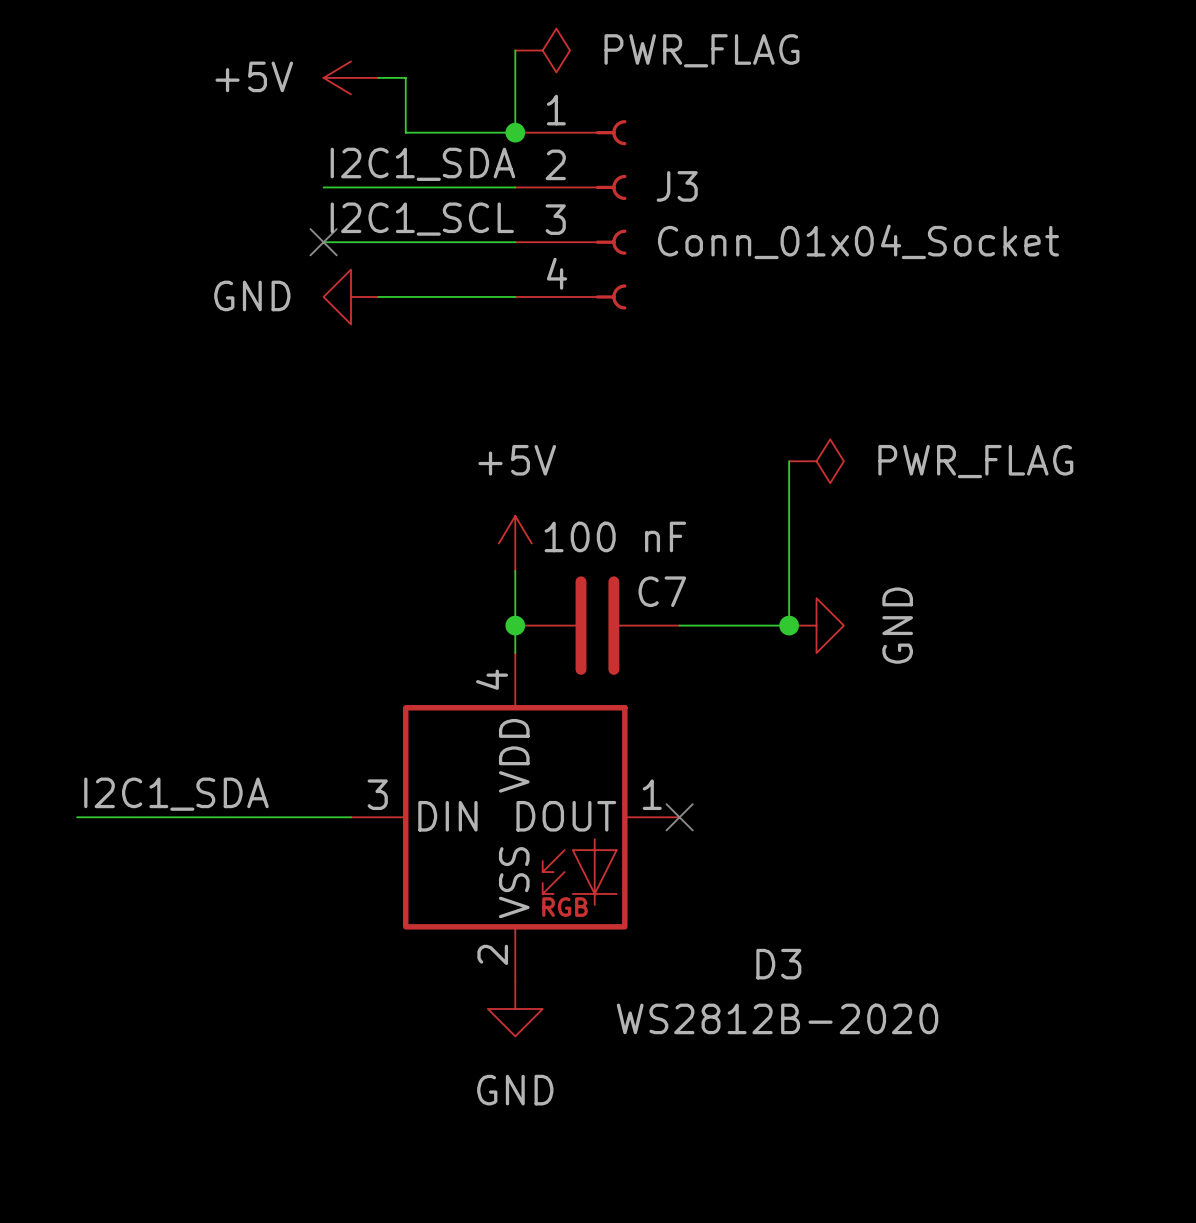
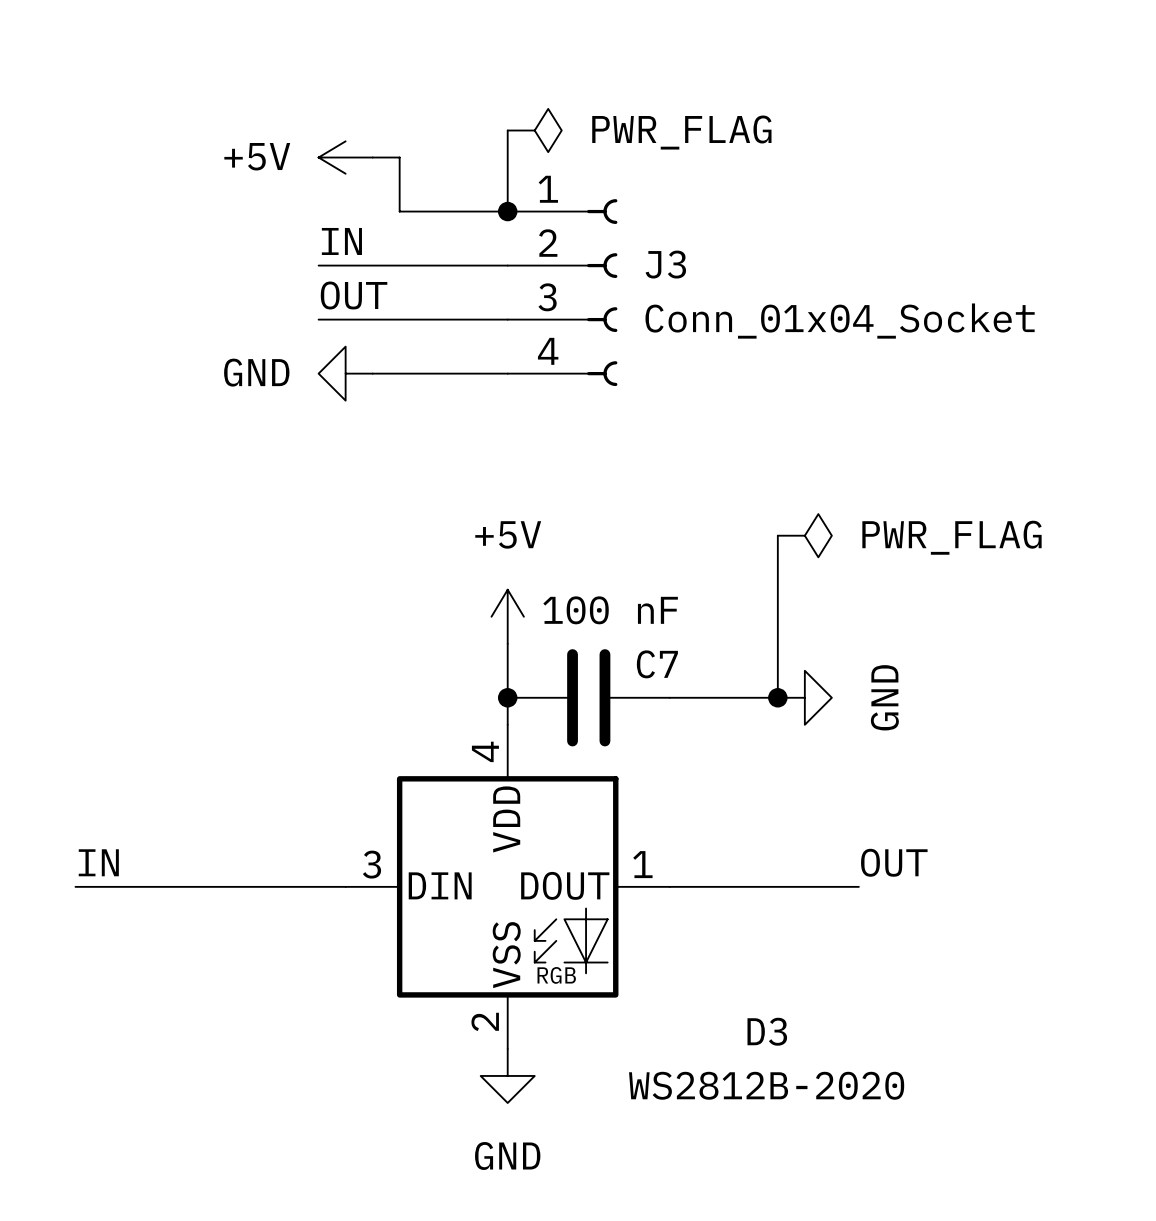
label: I2C1_SDA (422, 164) -> IN (341, 241)
label: I2C1_SCL (422, 219) -> OUT (354, 295)
no-connect mark: (323, 242) -> none
label: none -> OUT (894, 862)
label: I2C1_SDA (176, 794) -> IN (98, 862)
wire: none -> (669, 886) (858, 886)
no-connect mark: (679, 817) -> none

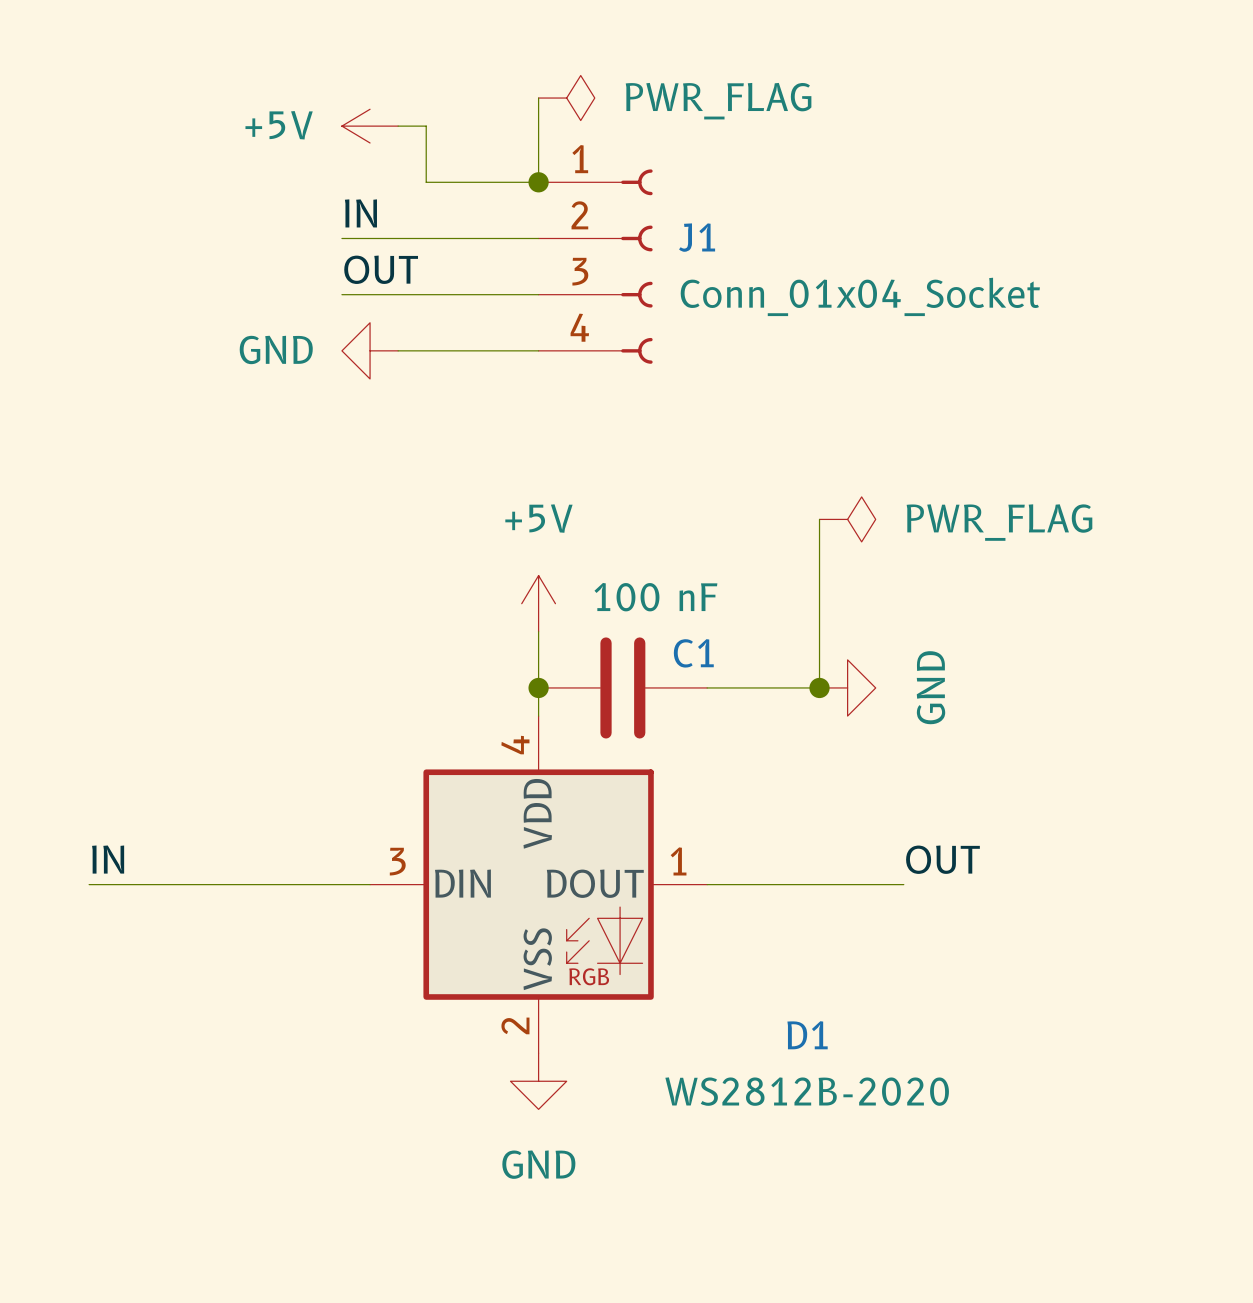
J3 name: J3 (665, 264) -> J1 (697, 237)
C7 name: C7 (657, 664) -> C1 (693, 653)
D3 name: D3 (767, 1031) -> D1 (807, 1035)

